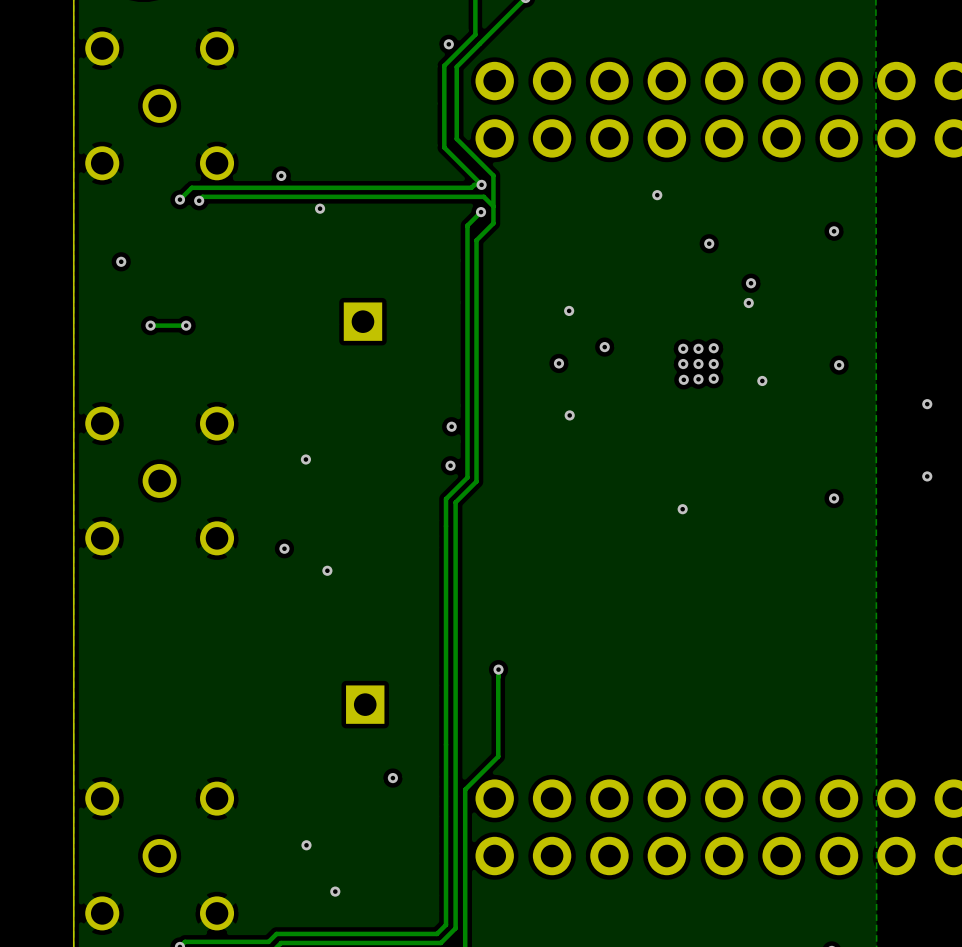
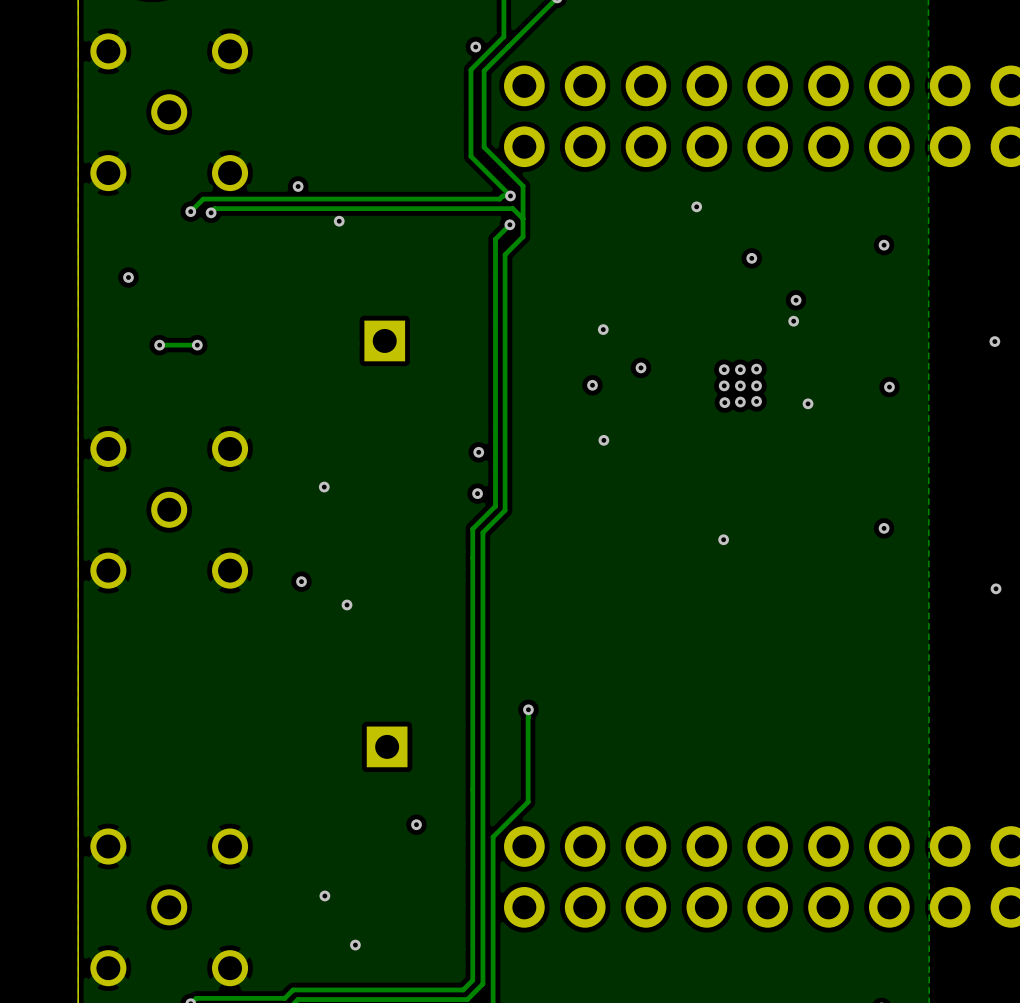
via: none -> (994, 341)
via: (927, 404) -> none
via: (927, 476) -> none
via: none -> (996, 588)

